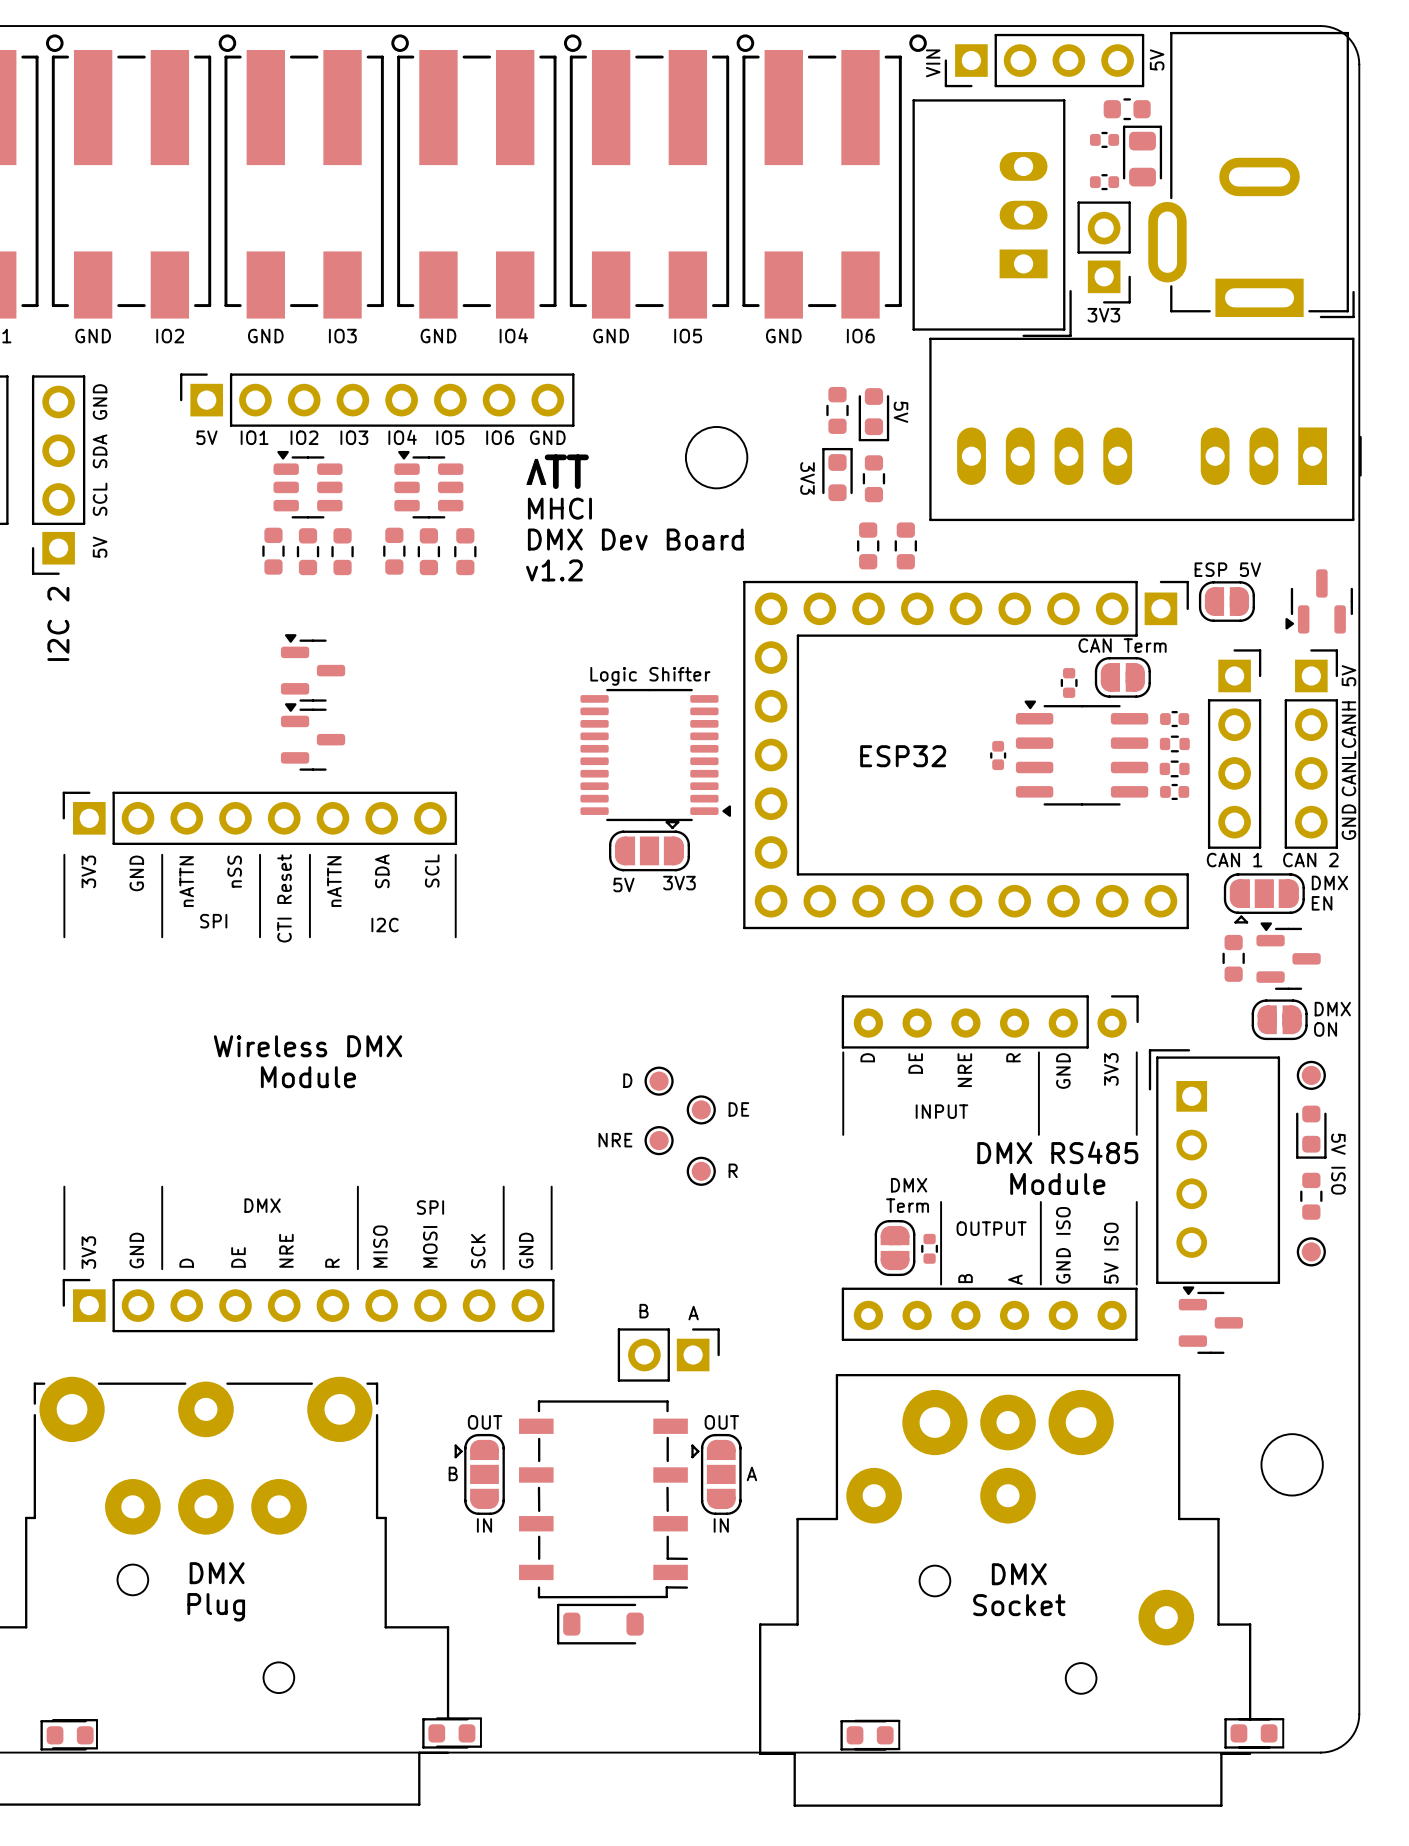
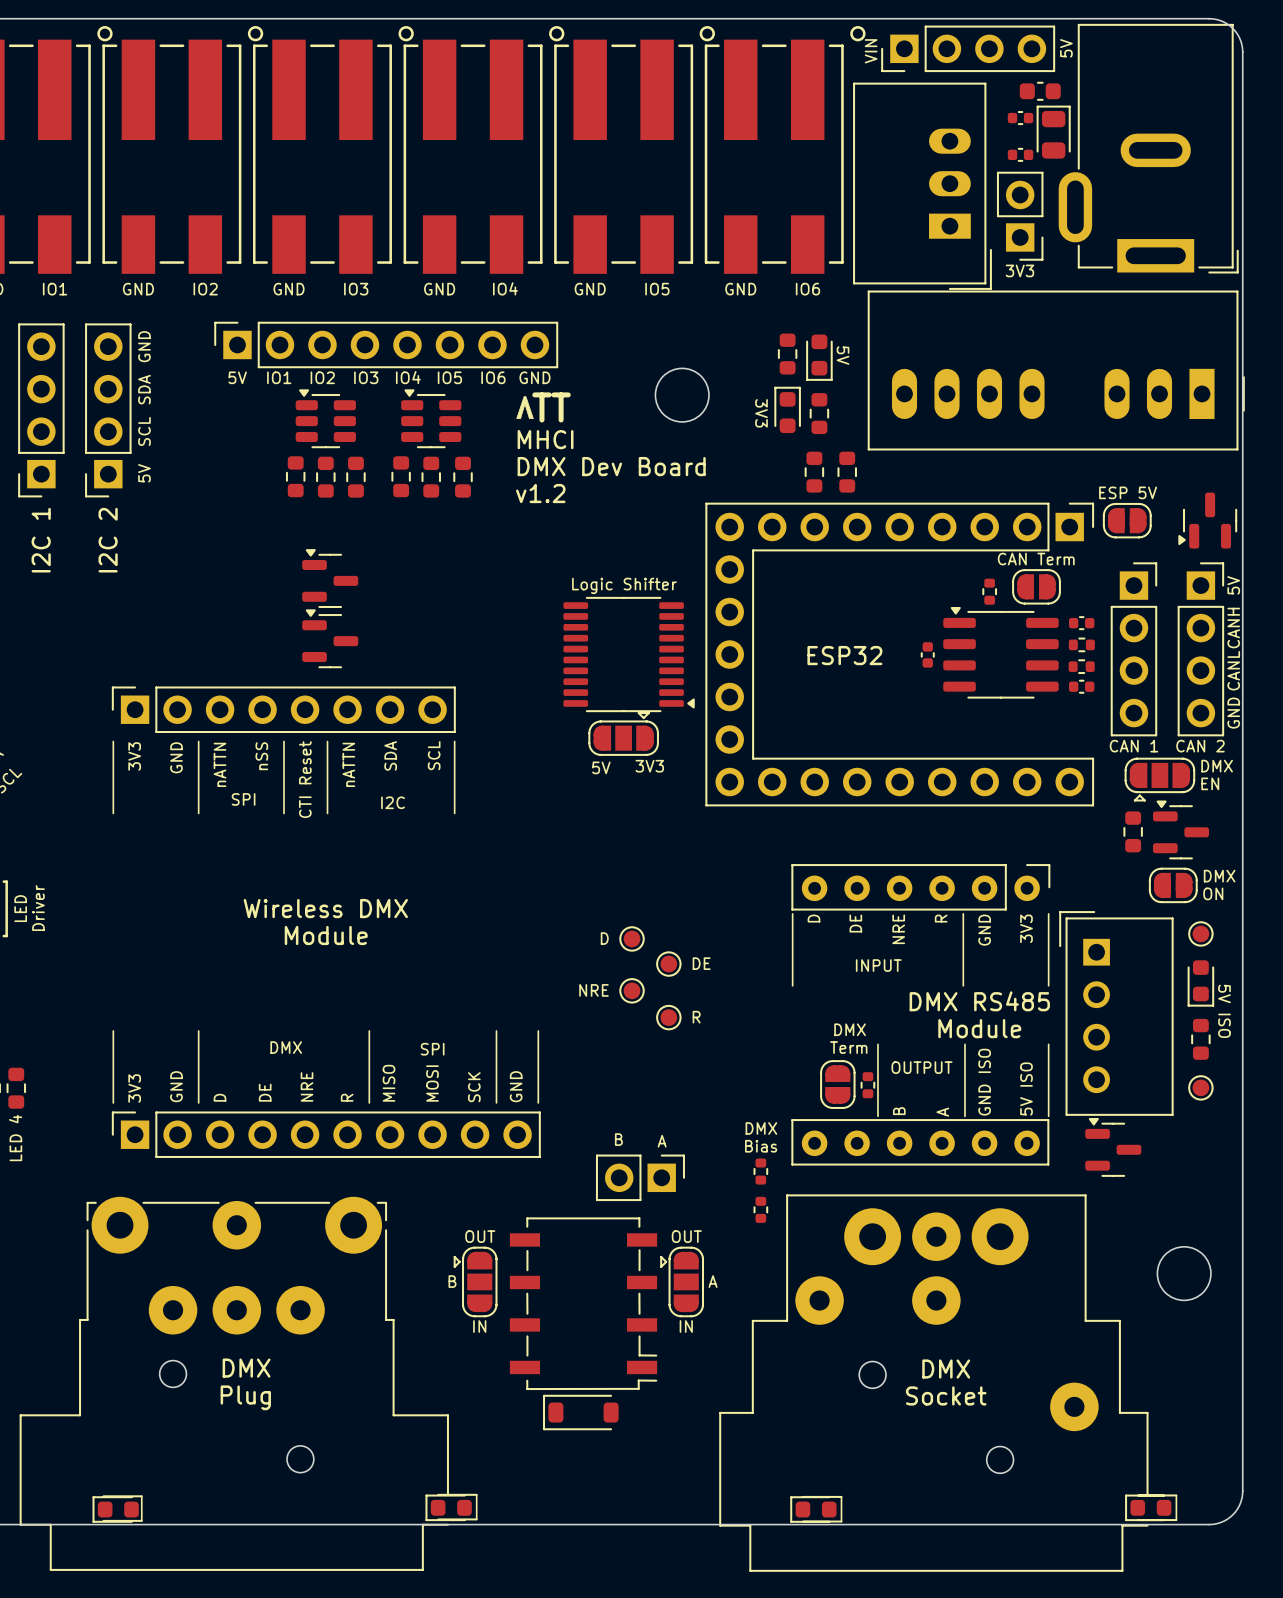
text: none -> DMX (761, 1128)
text: none -> Bias (761, 1146)
part: none -> (760, 1171)
part: none -> (760, 1209)

